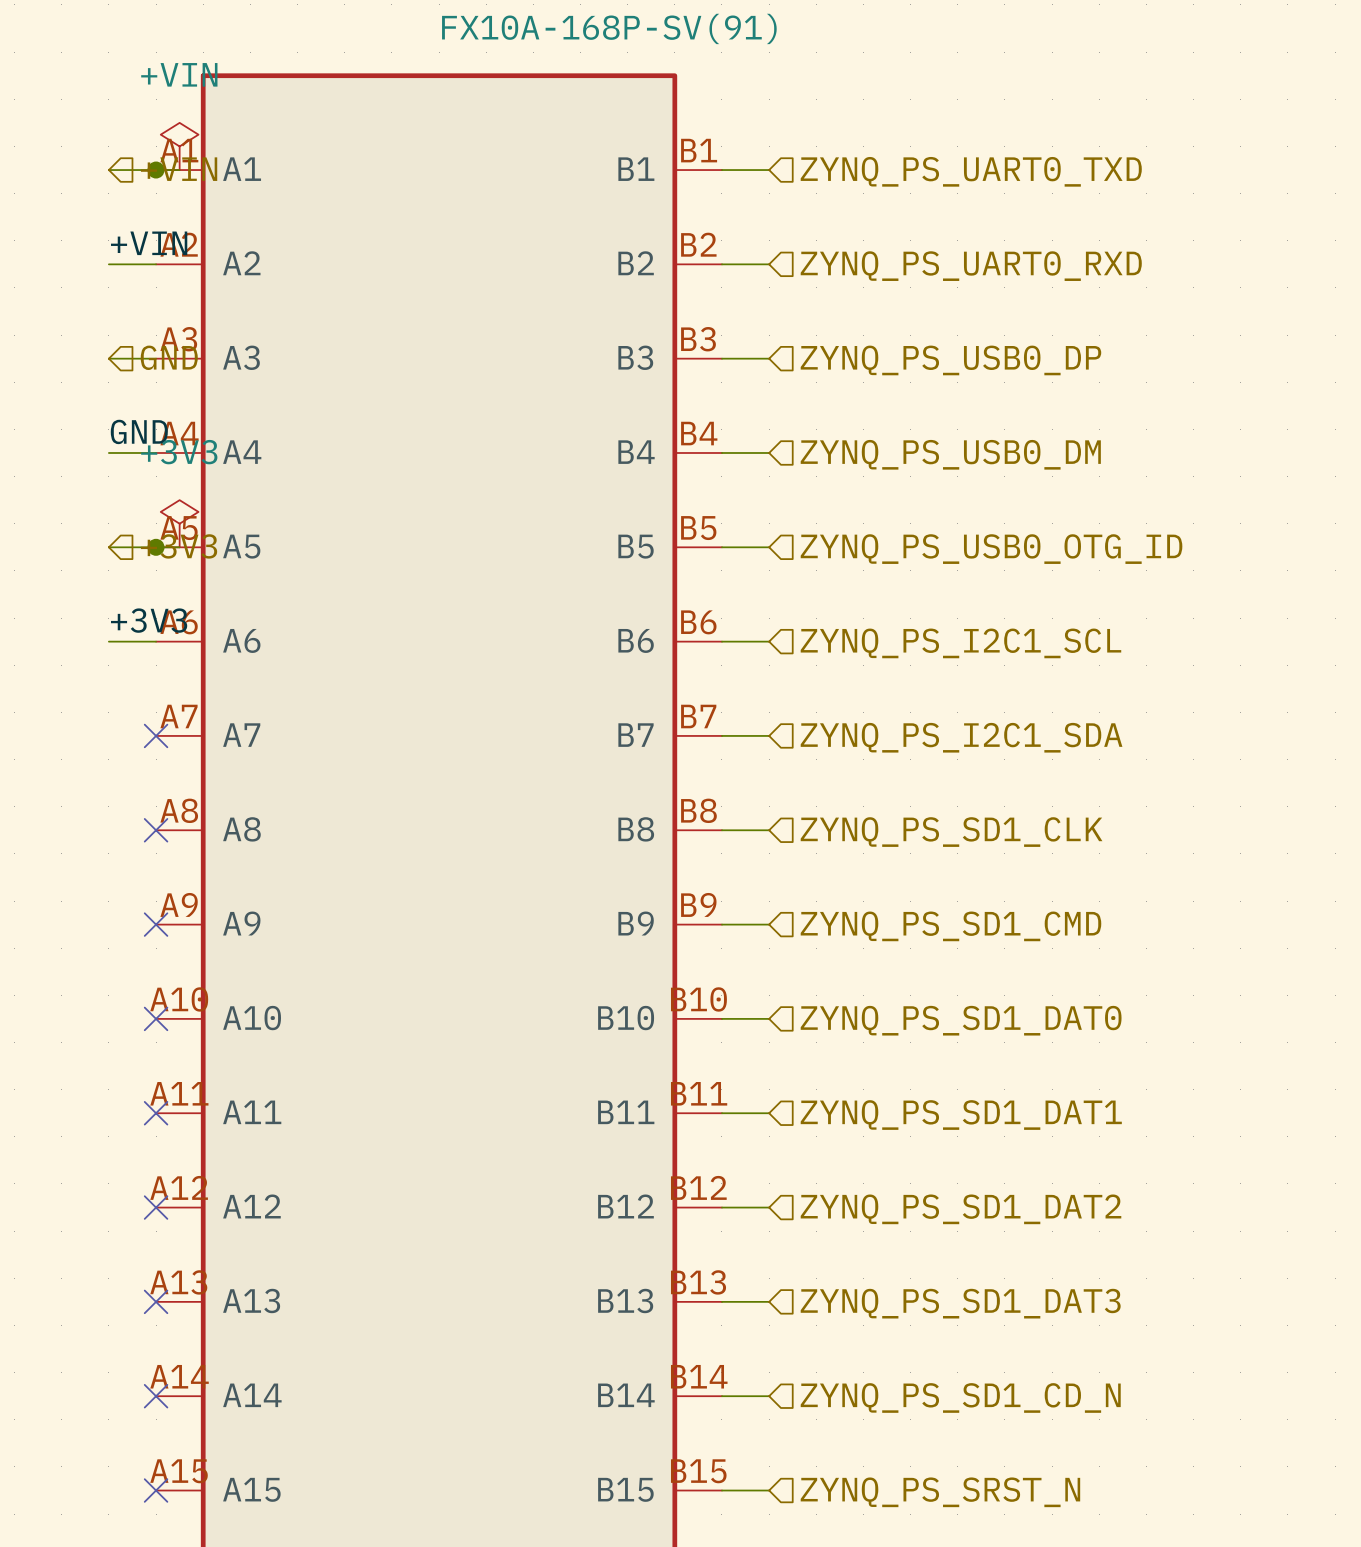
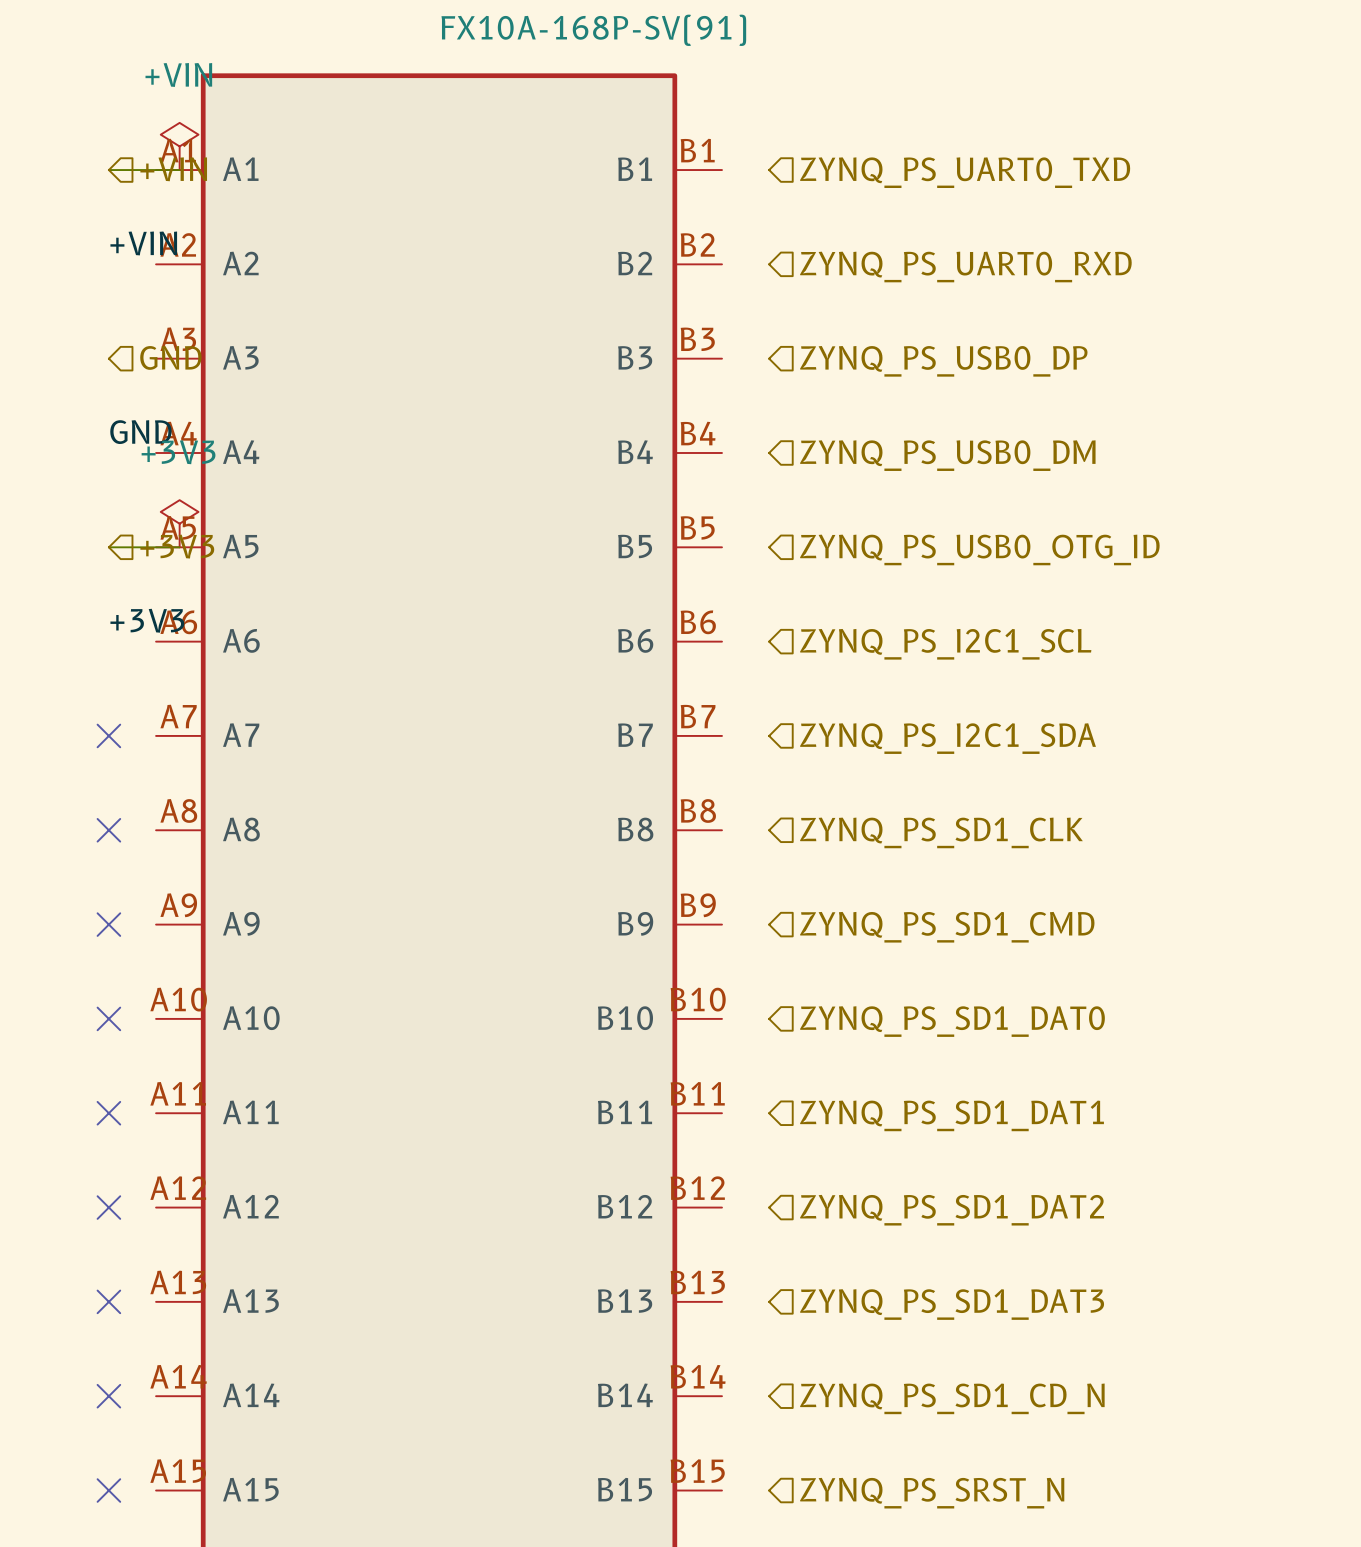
junction: (156, 170) -> none
wire: (721, 170) (769, 170) -> none
wire: (108, 264) (156, 264) -> none
wire: (721, 264) (769, 264) -> none
wire: (108, 358) (156, 358) -> none
wire: (721, 358) (769, 358) -> none
wire: (108, 452) (156, 452) -> none
wire: (721, 452) (769, 452) -> none
junction: (156, 547) -> none
wire: (721, 547) (769, 547) -> none
wire: (108, 641) (156, 641) -> none
wire: (721, 641) (769, 641) -> none
no-connect mark position: (156, 735) -> (108, 735)
wire: (721, 735) (769, 735) -> none
no-connect mark position: (156, 830) -> (108, 830)
wire: (721, 830) (769, 830) -> none
no-connect mark position: (156, 924) -> (108, 924)
wire: (721, 924) (769, 924) -> none
no-connect mark position: (156, 1018) -> (108, 1018)
wire: (721, 1018) (769, 1018) -> none
no-connect mark position: (156, 1113) -> (108, 1113)
wire: (721, 1113) (769, 1113) -> none
no-connect mark position: (156, 1207) -> (108, 1207)
wire: (721, 1207) (769, 1207) -> none
no-connect mark position: (156, 1301) -> (108, 1301)
wire: (721, 1301) (769, 1301) -> none
no-connect mark position: (156, 1396) -> (108, 1396)
wire: (721, 1396) (769, 1396) -> none
no-connect mark position: (156, 1490) -> (108, 1490)
wire: (721, 1490) (769, 1490) -> none

